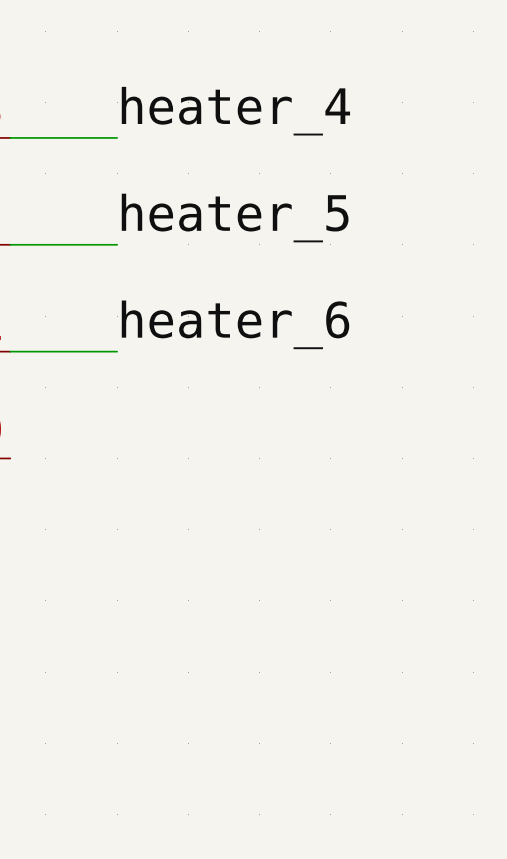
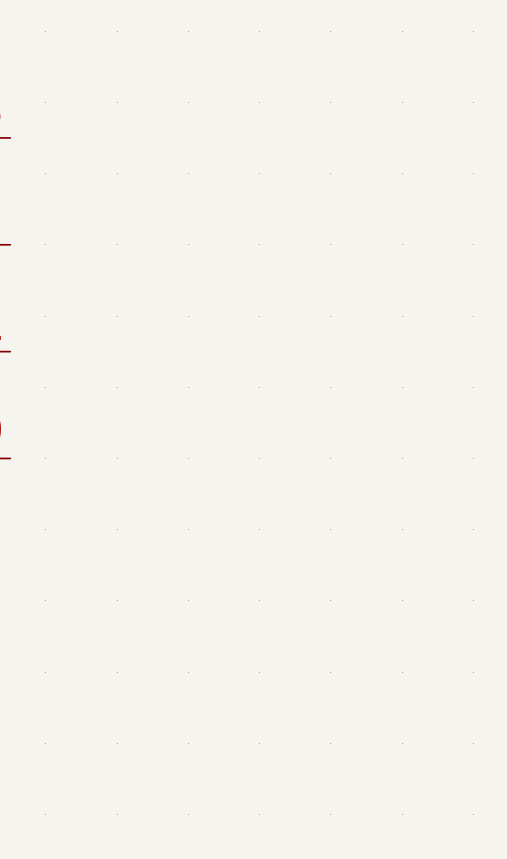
label: heater_4 (235, 111) -> none
wire: (10, 137) (117, 137) -> none
label: heater_5 (235, 218) -> none
wire: (10, 244) (117, 244) -> none
label: heater_6 (235, 324) -> none
wire: (10, 351) (117, 351) -> none

